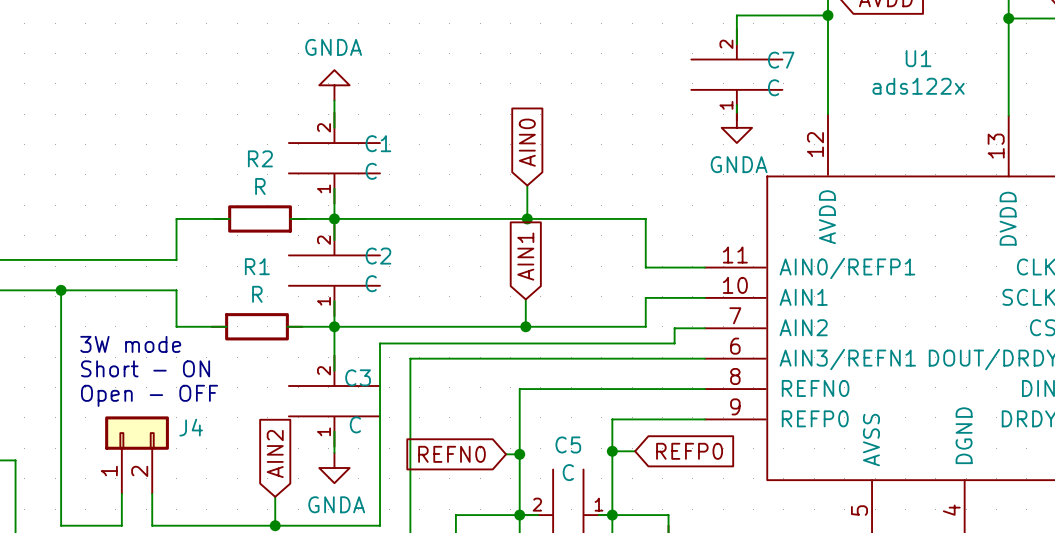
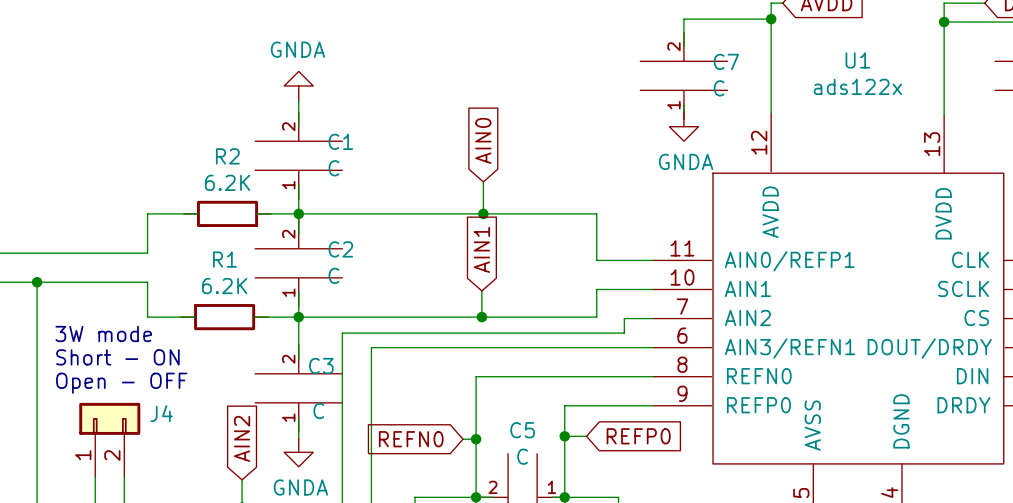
R2 value: R (260, 186) -> 6.2K (227, 182)
R1 value: R (257, 294) -> 6.2K (224, 286)

